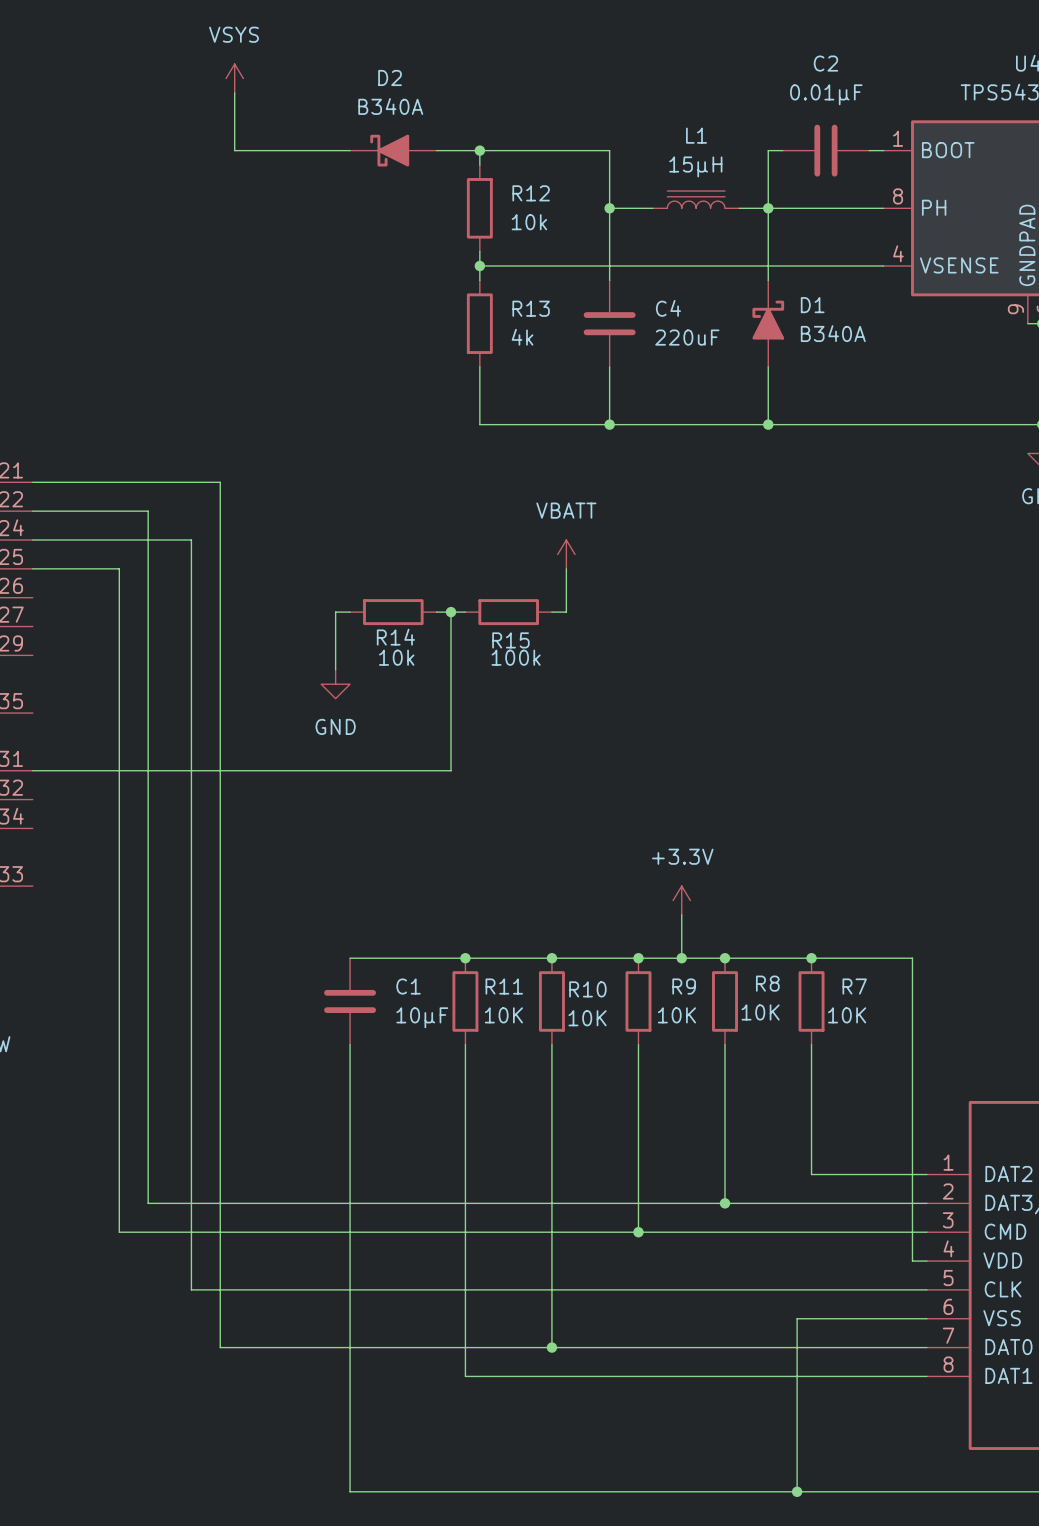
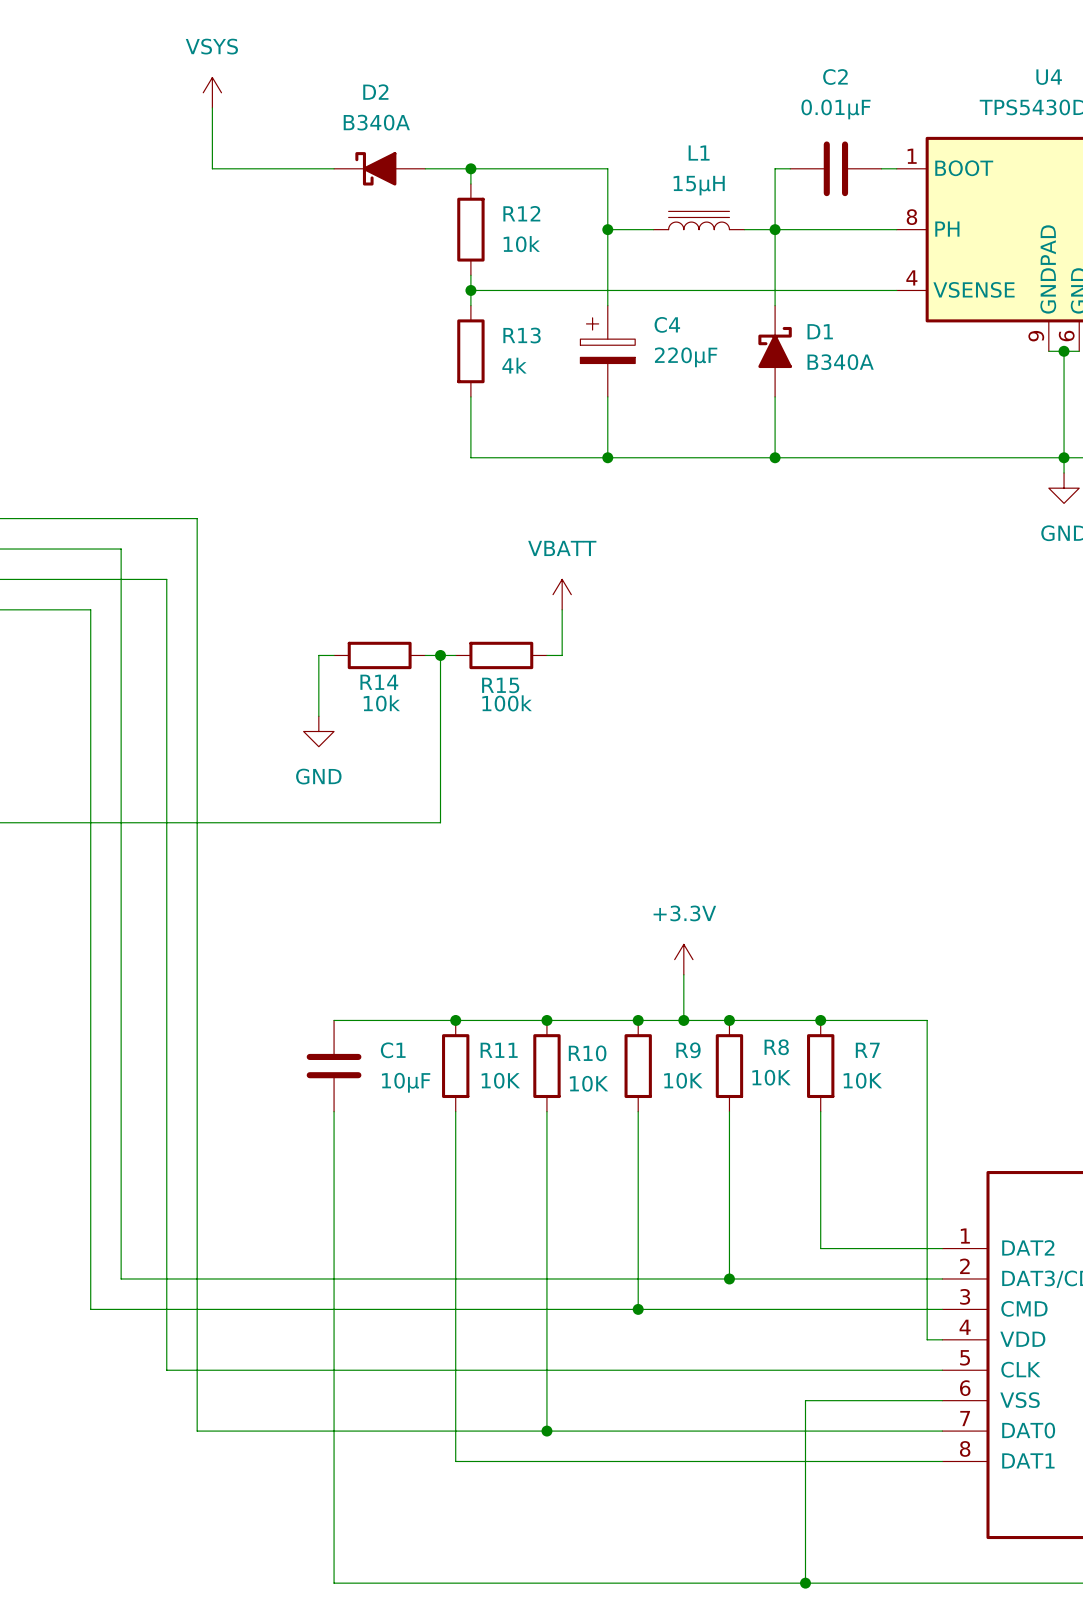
C4 symbol: [583, 280, 636, 367] -> [580, 305, 636, 397]
C4 value: 220uF (687, 337) -> 220µF (686, 357)

